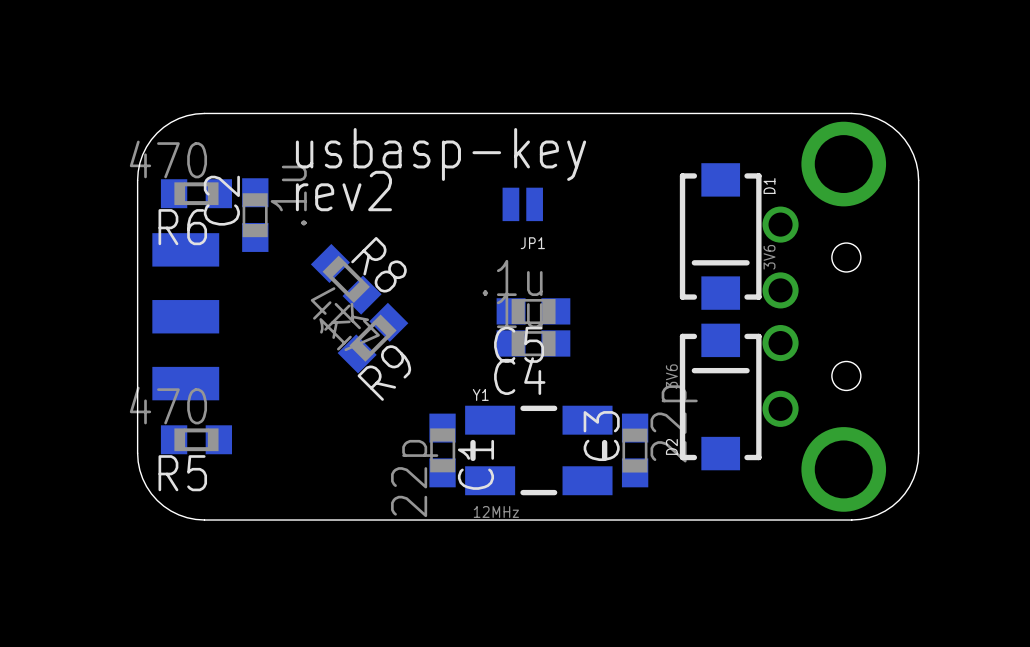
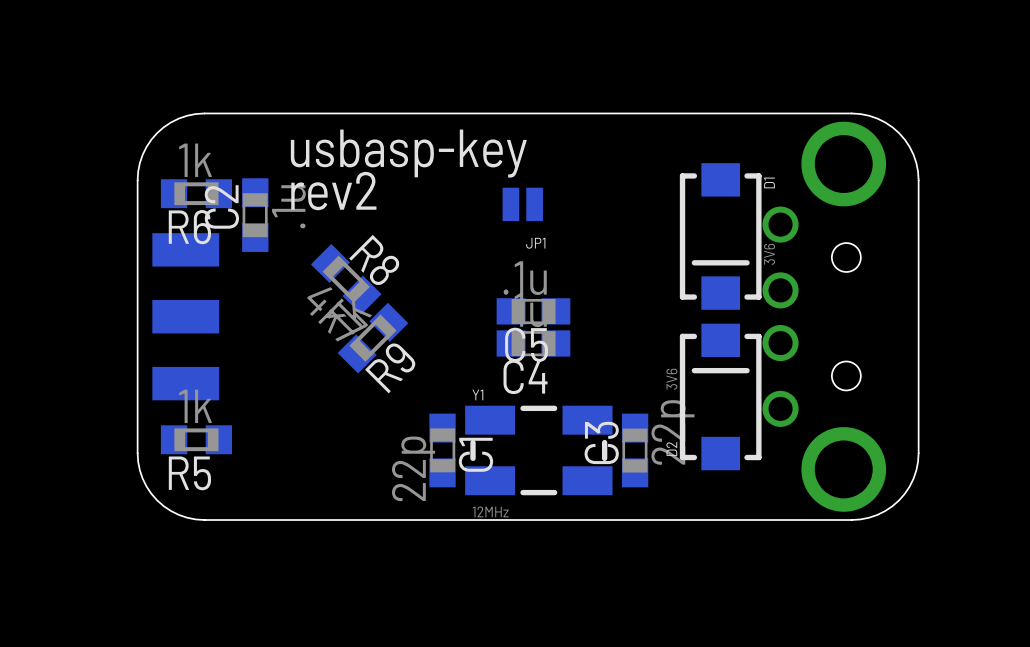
R6 value: 470 (168, 159) -> 1k (195, 160)
R5 value: 470 (168, 405) -> 1k (195, 406)

